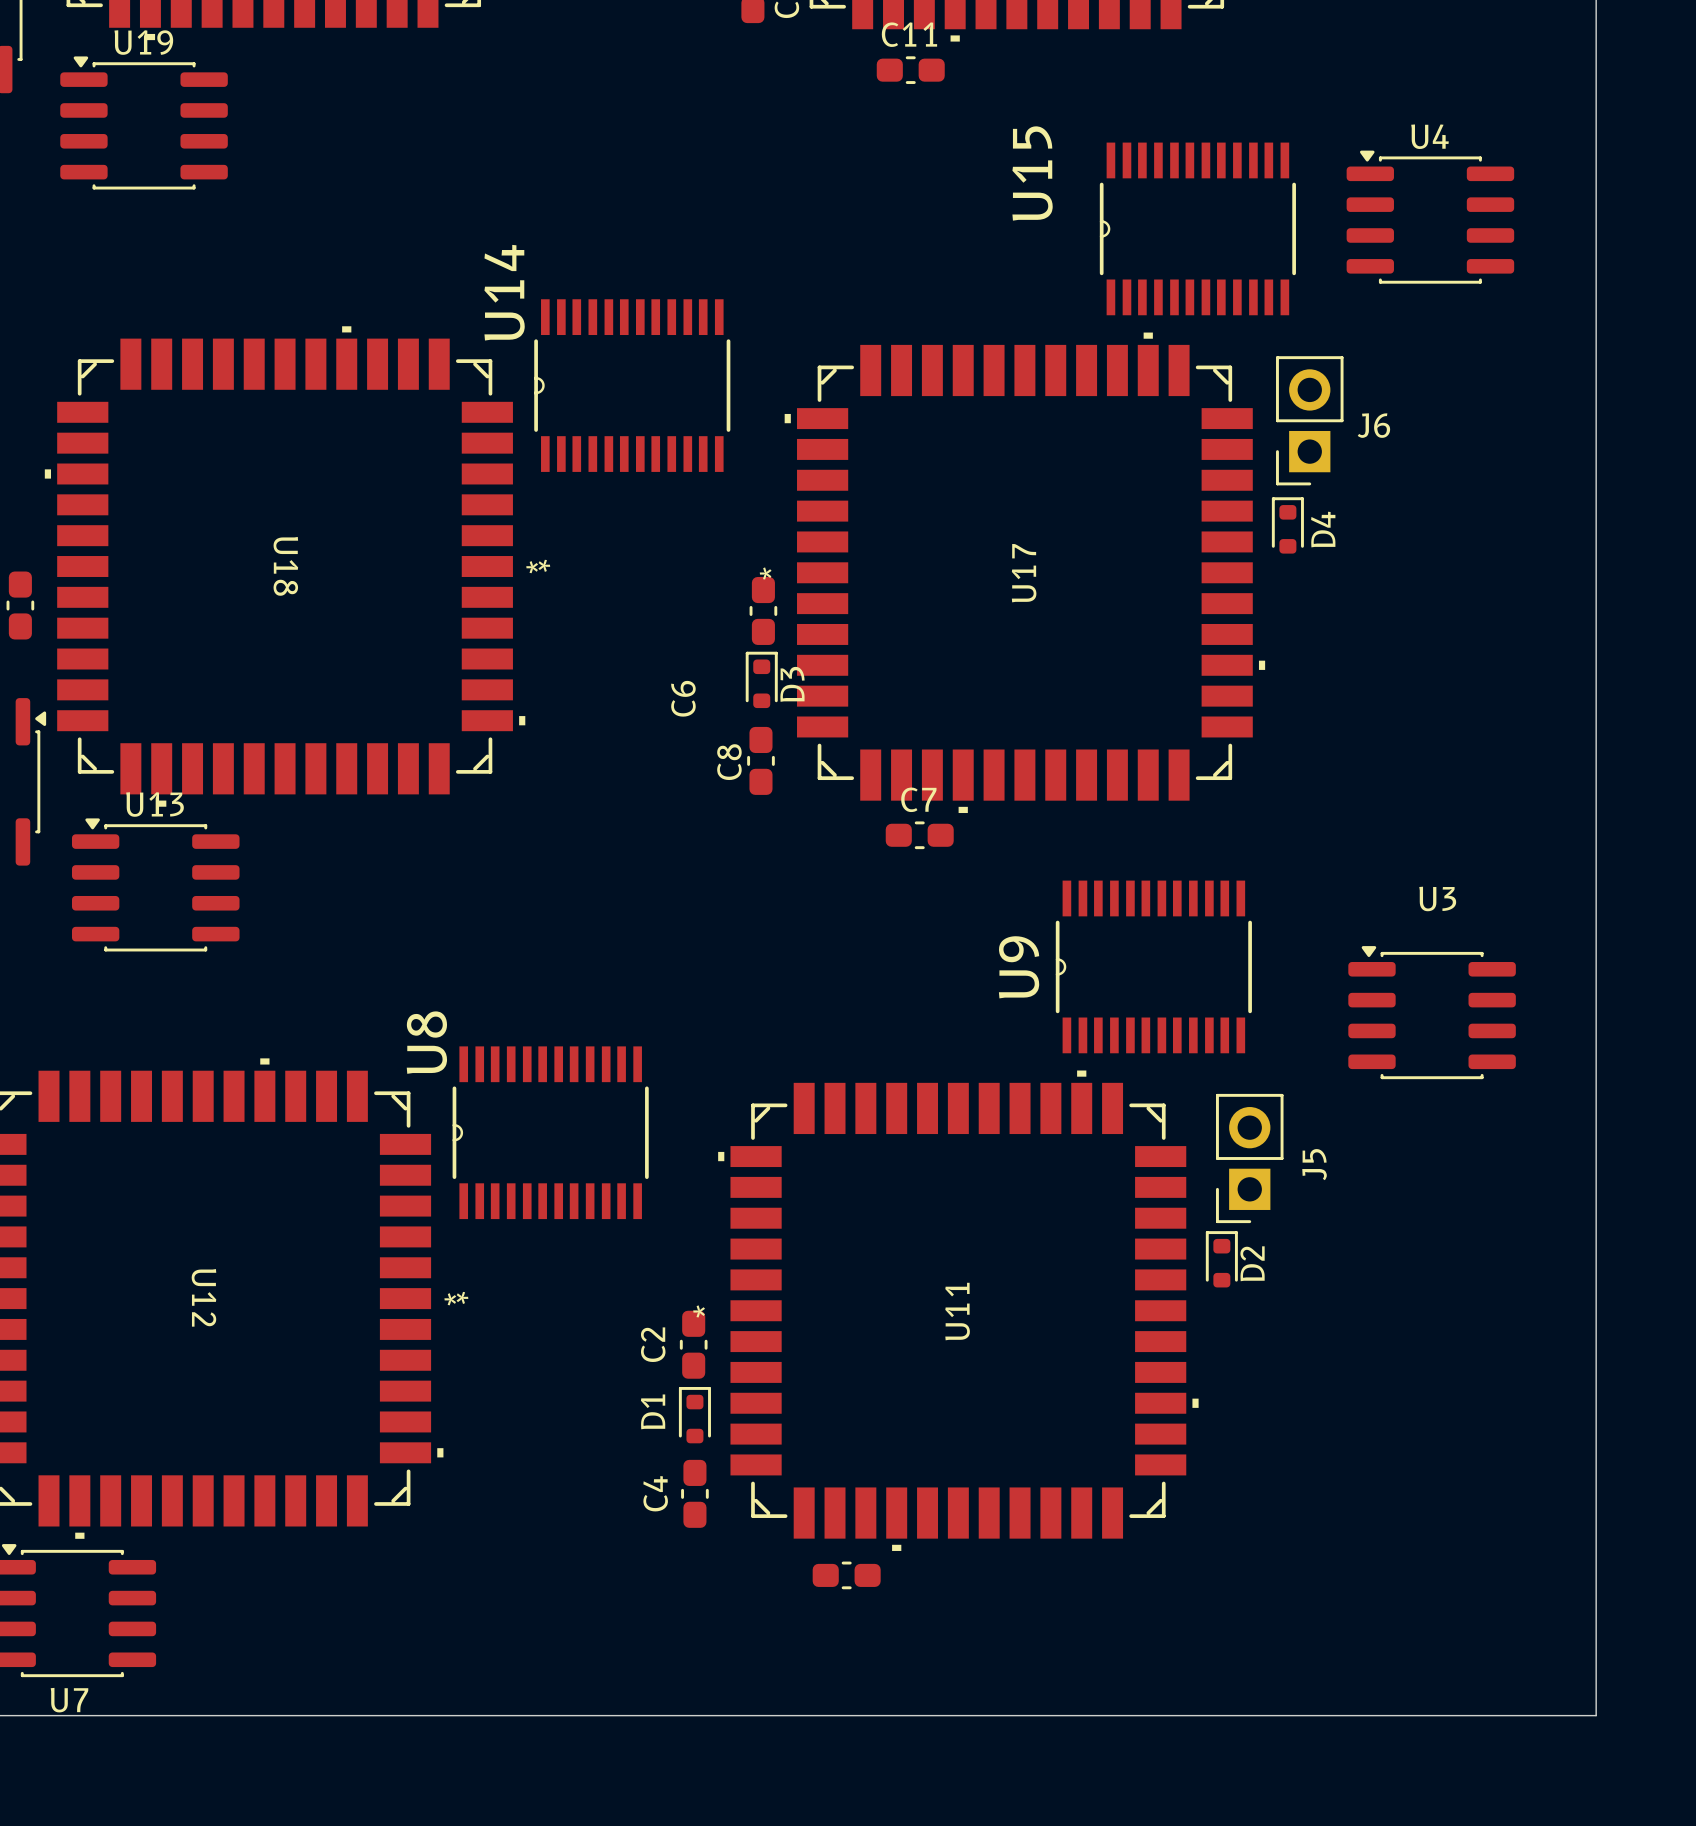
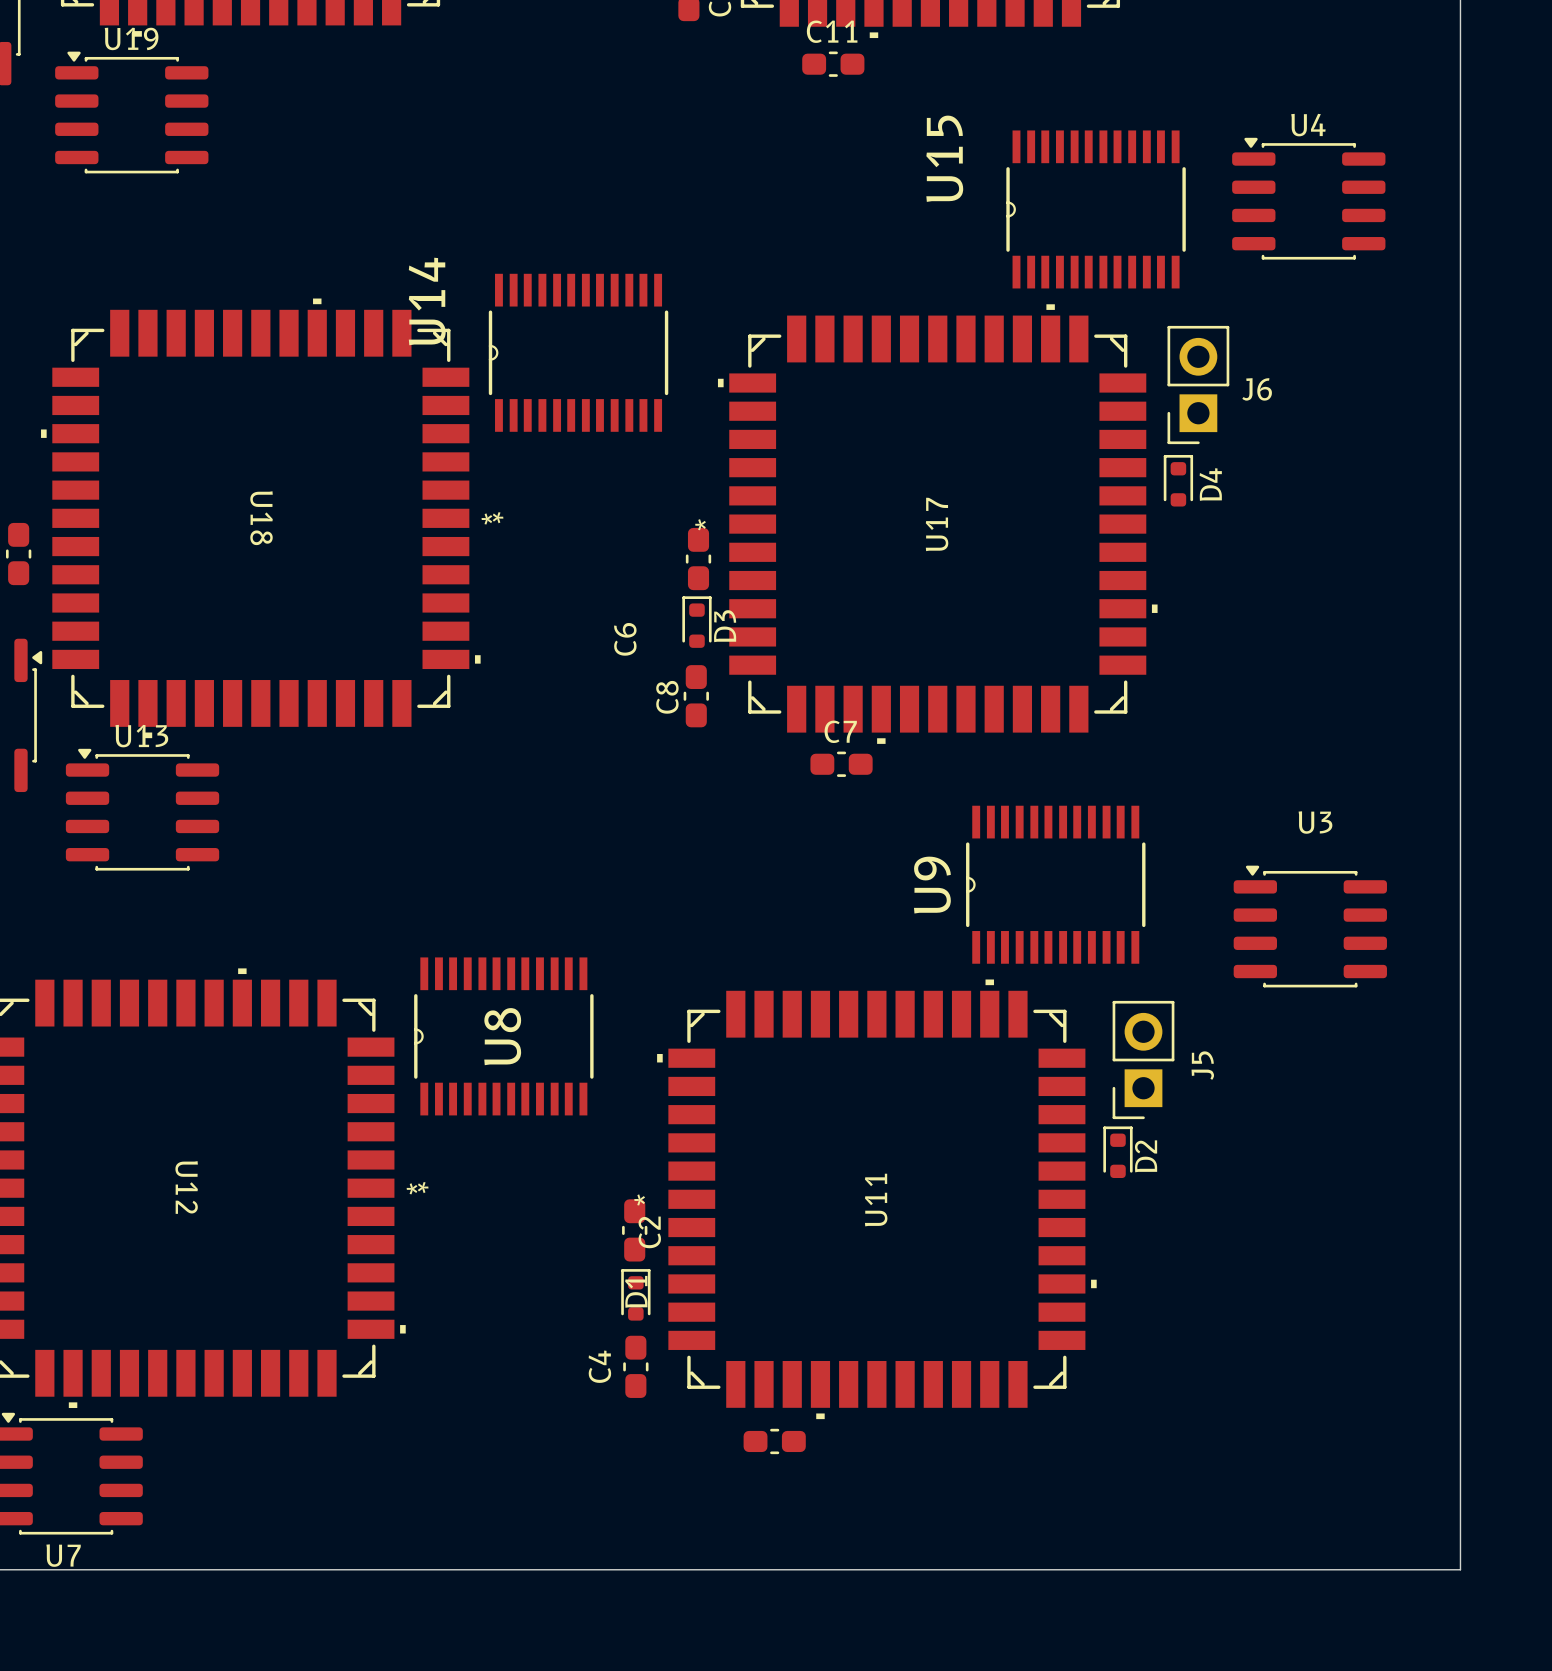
U14 name position: U14 (504, 292) -> U14 (427, 301)
U8 name position: U8 (426, 1042) -> U8 (502, 1036)
C2 name position: C2 (653, 1344) -> C2 (649, 1232)
D1 name position: D1 (653, 1411) -> D1 (636, 1291)

